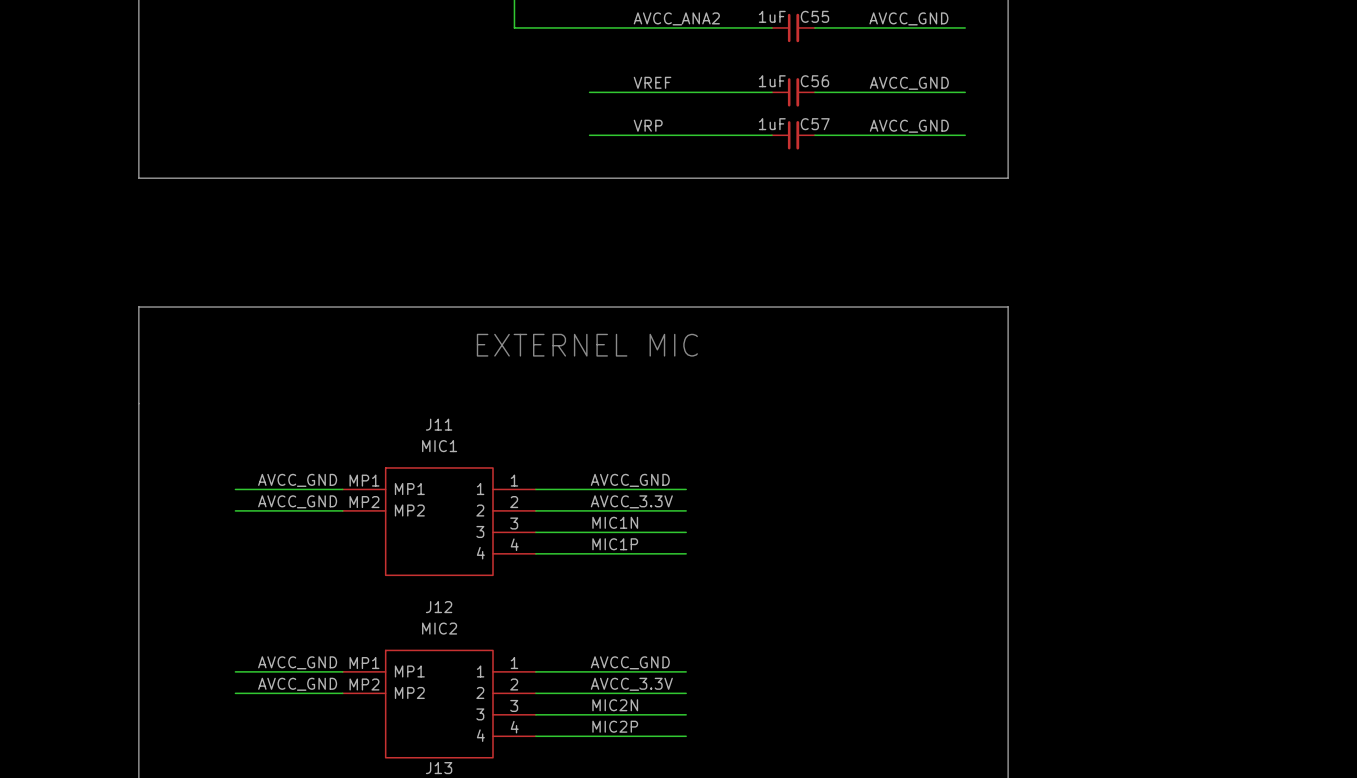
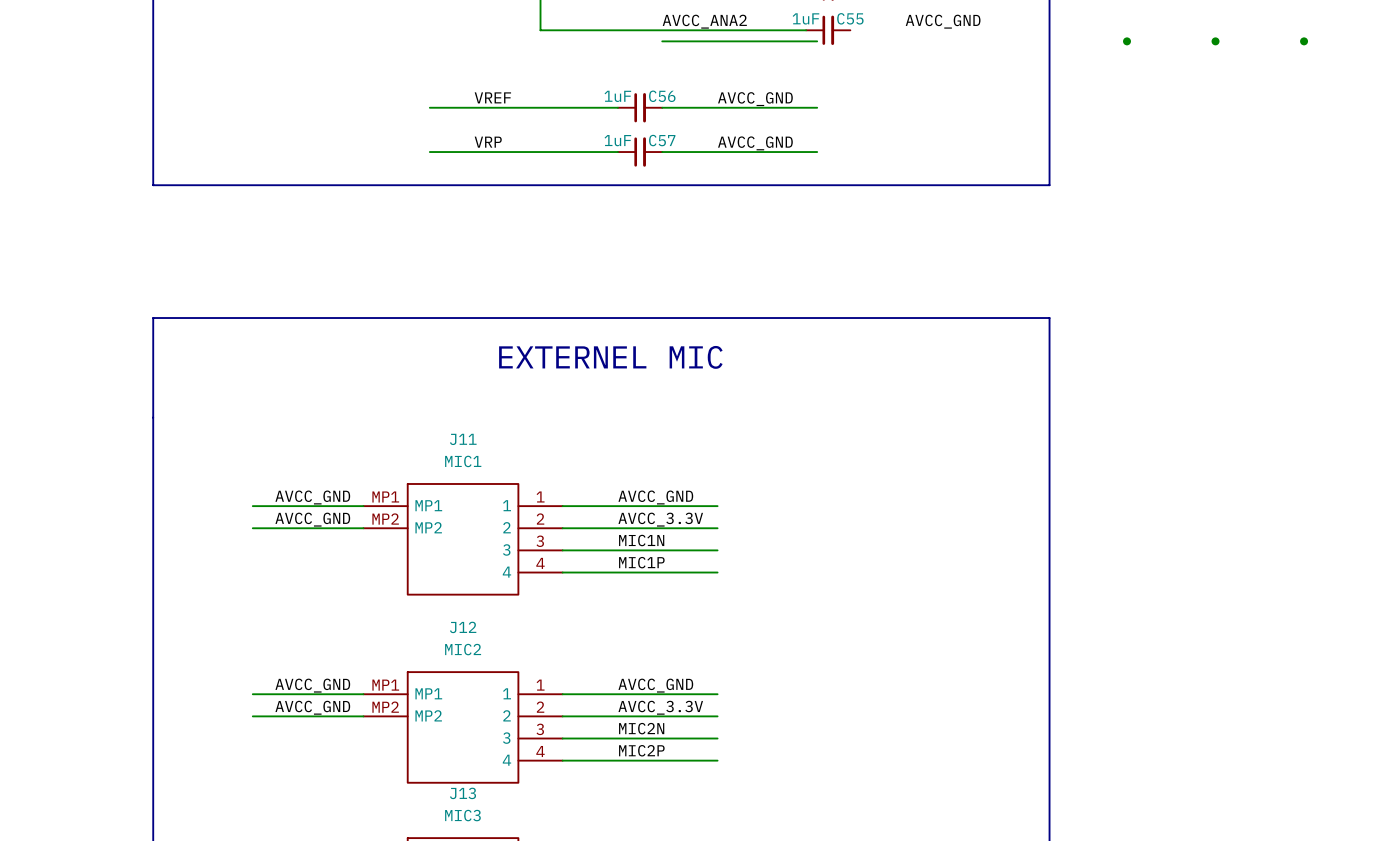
wire: (814, 27) (965, 27) -> (662, 41) (817, 41)
junction: none -> (1127, 41)
junction: none -> (1215, 41)
junction: none -> (1304, 41)
label position: VREF (652, 82) -> VREF (492, 97)
label: AVCC_GND (909, 83) -> none
wire: (589, 92) (772, 92) -> (429, 107) (617, 107)
C56 position: (793, 92) -> (640, 107)
wire: (814, 92) (965, 92) -> (662, 107) (817, 107)
label: none -> AVCC_GND (755, 99)
label position: VRP (648, 125) -> VRP (488, 142)
label: AVCC_GND (909, 126) -> none
wire: (589, 135) (772, 135) -> (429, 152) (617, 152)
C57 position: (793, 135) -> (640, 152)
wire: (814, 135) (965, 135) -> (662, 152) (817, 152)
label: none -> AVCC_GND (755, 143)

